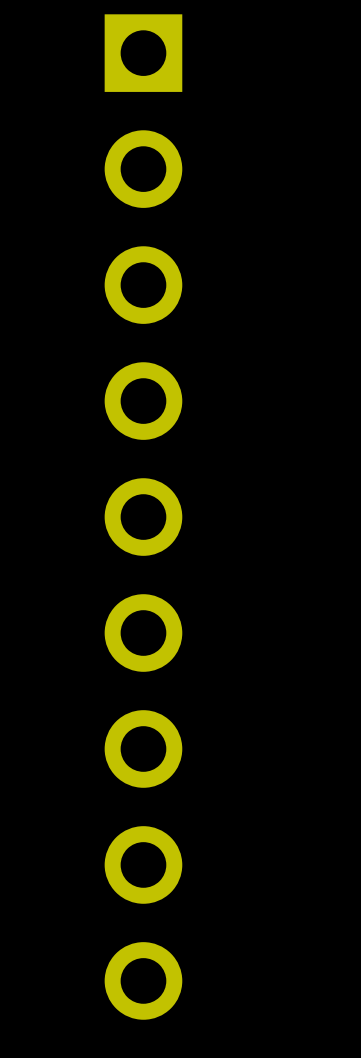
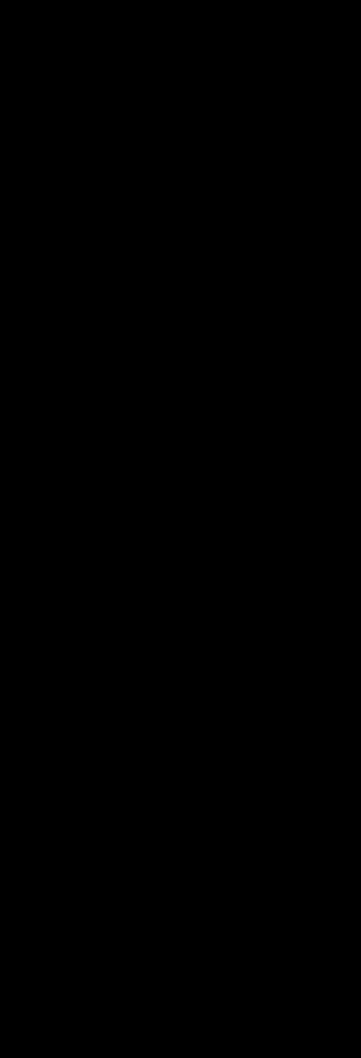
part: (143, 517) -> none

